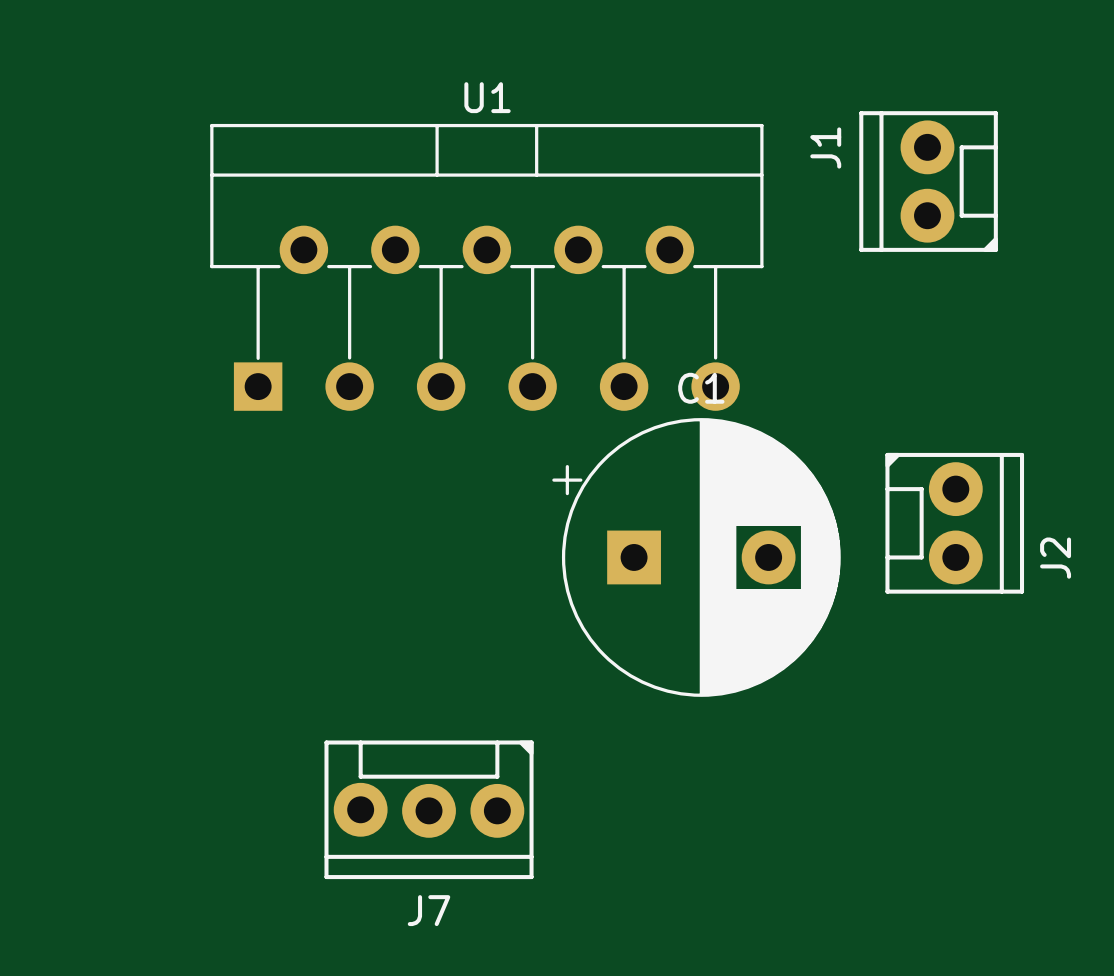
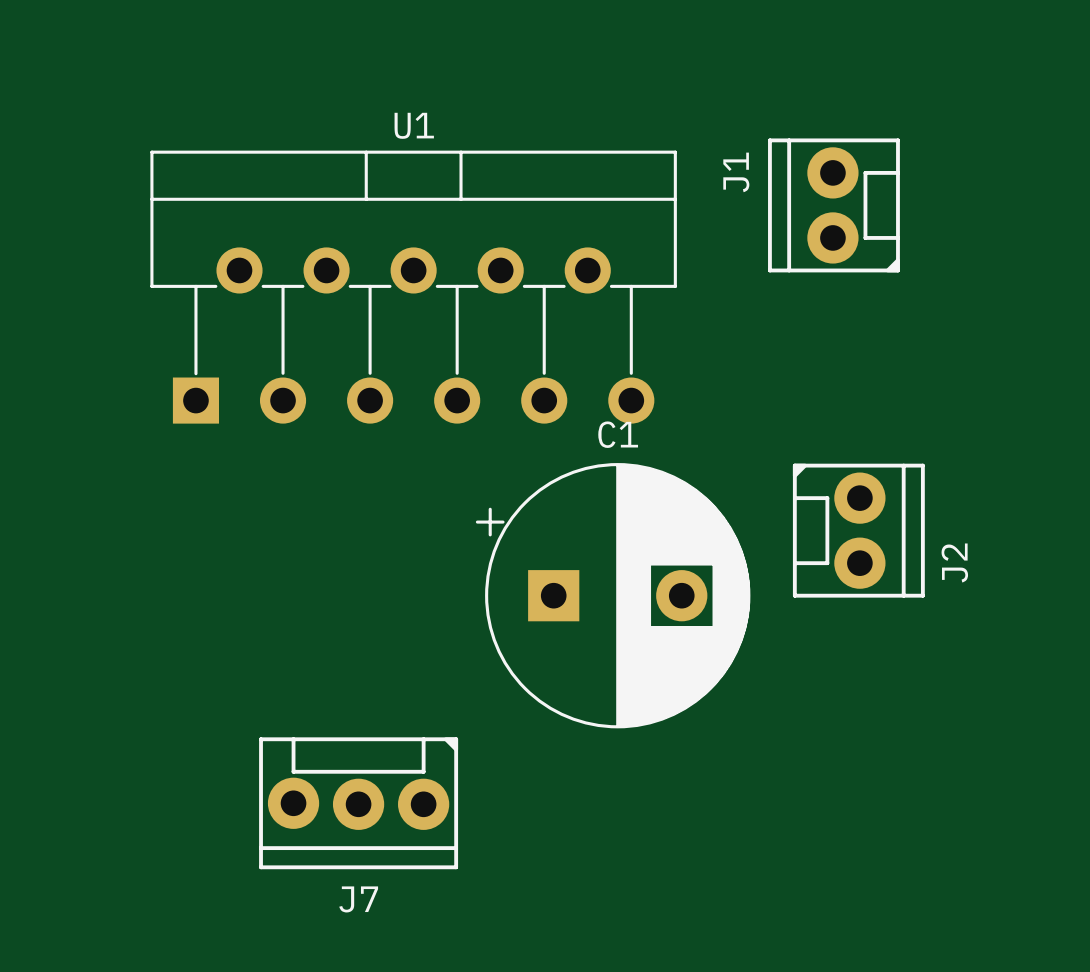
C1 position: (696, 557) -> (613, 595)

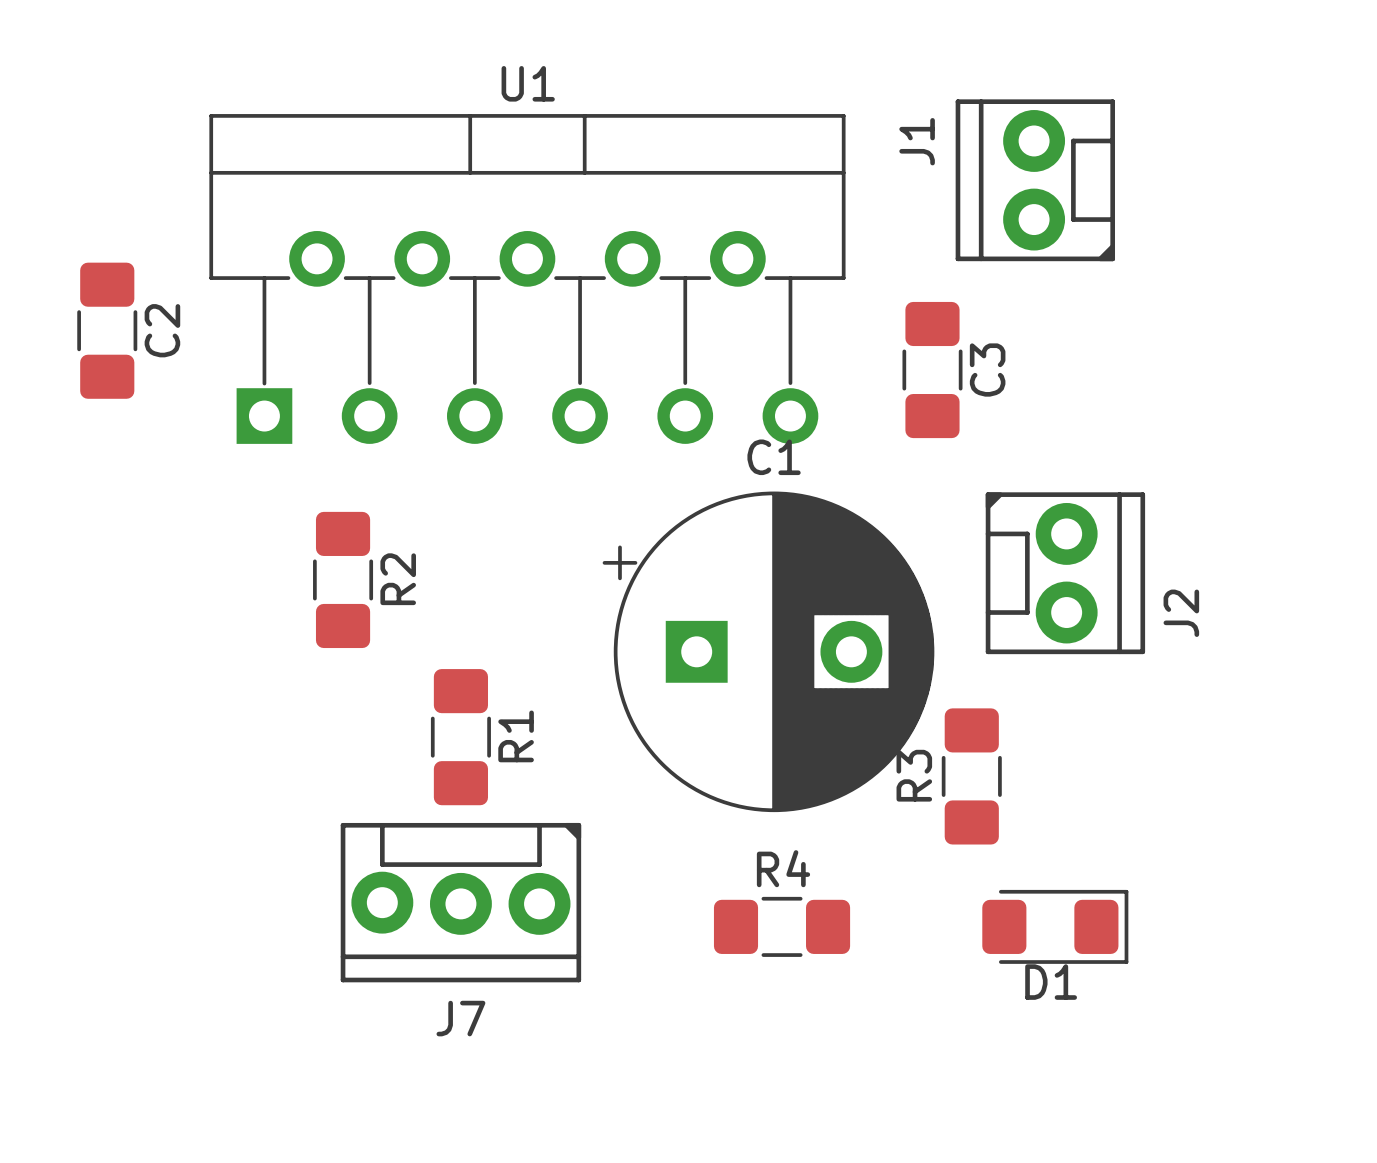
C2: none -> (107, 330)
C3: none -> (932, 370)
R2: none -> (343, 579)
R1: none -> (460, 737)
R3: none -> (971, 776)
R4: none -> (782, 926)
D1: none -> (1055, 926)

